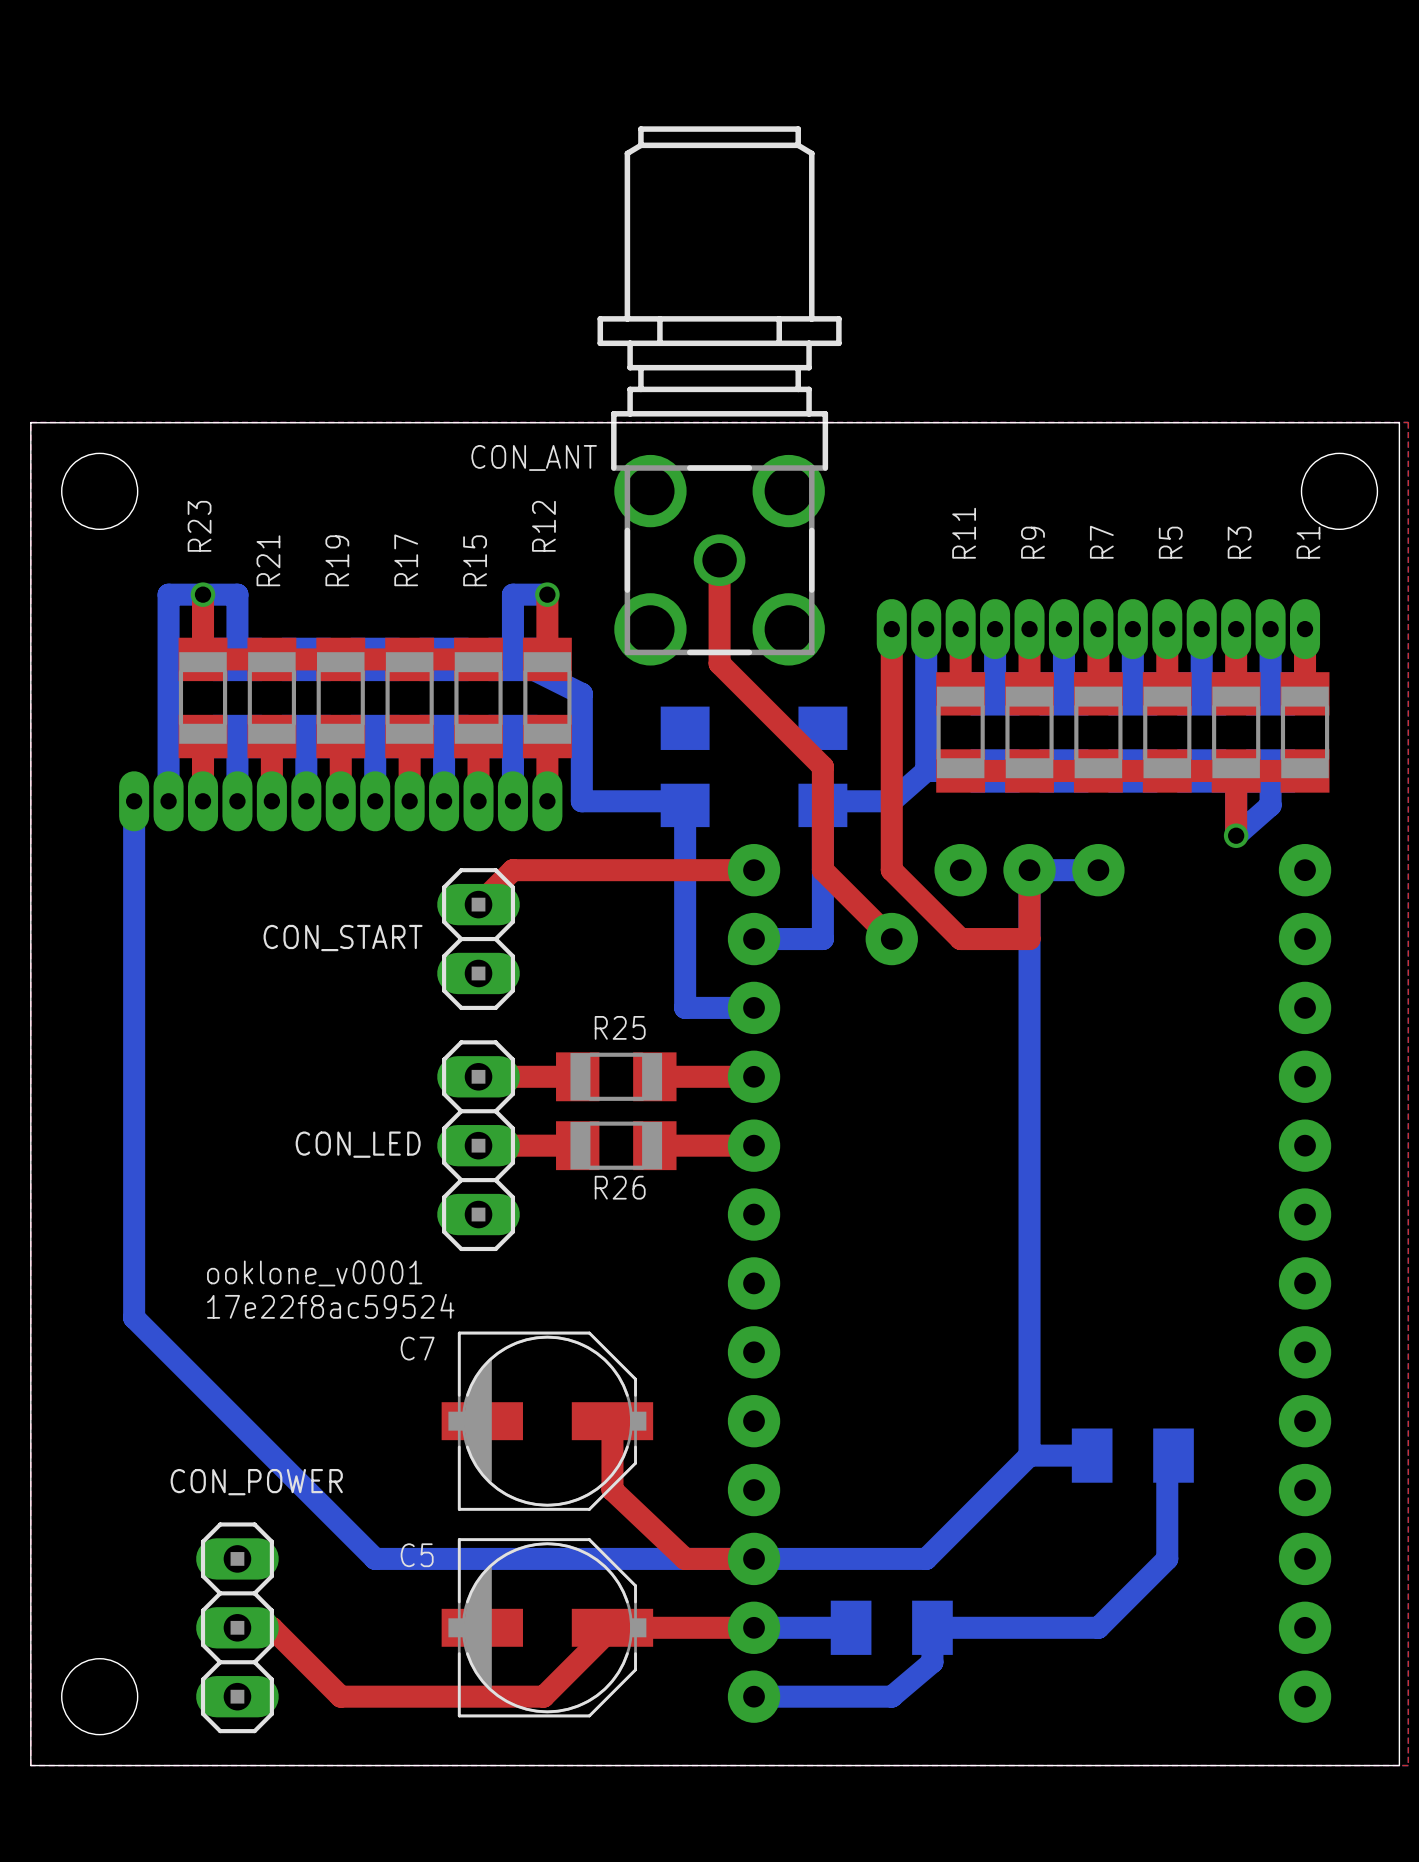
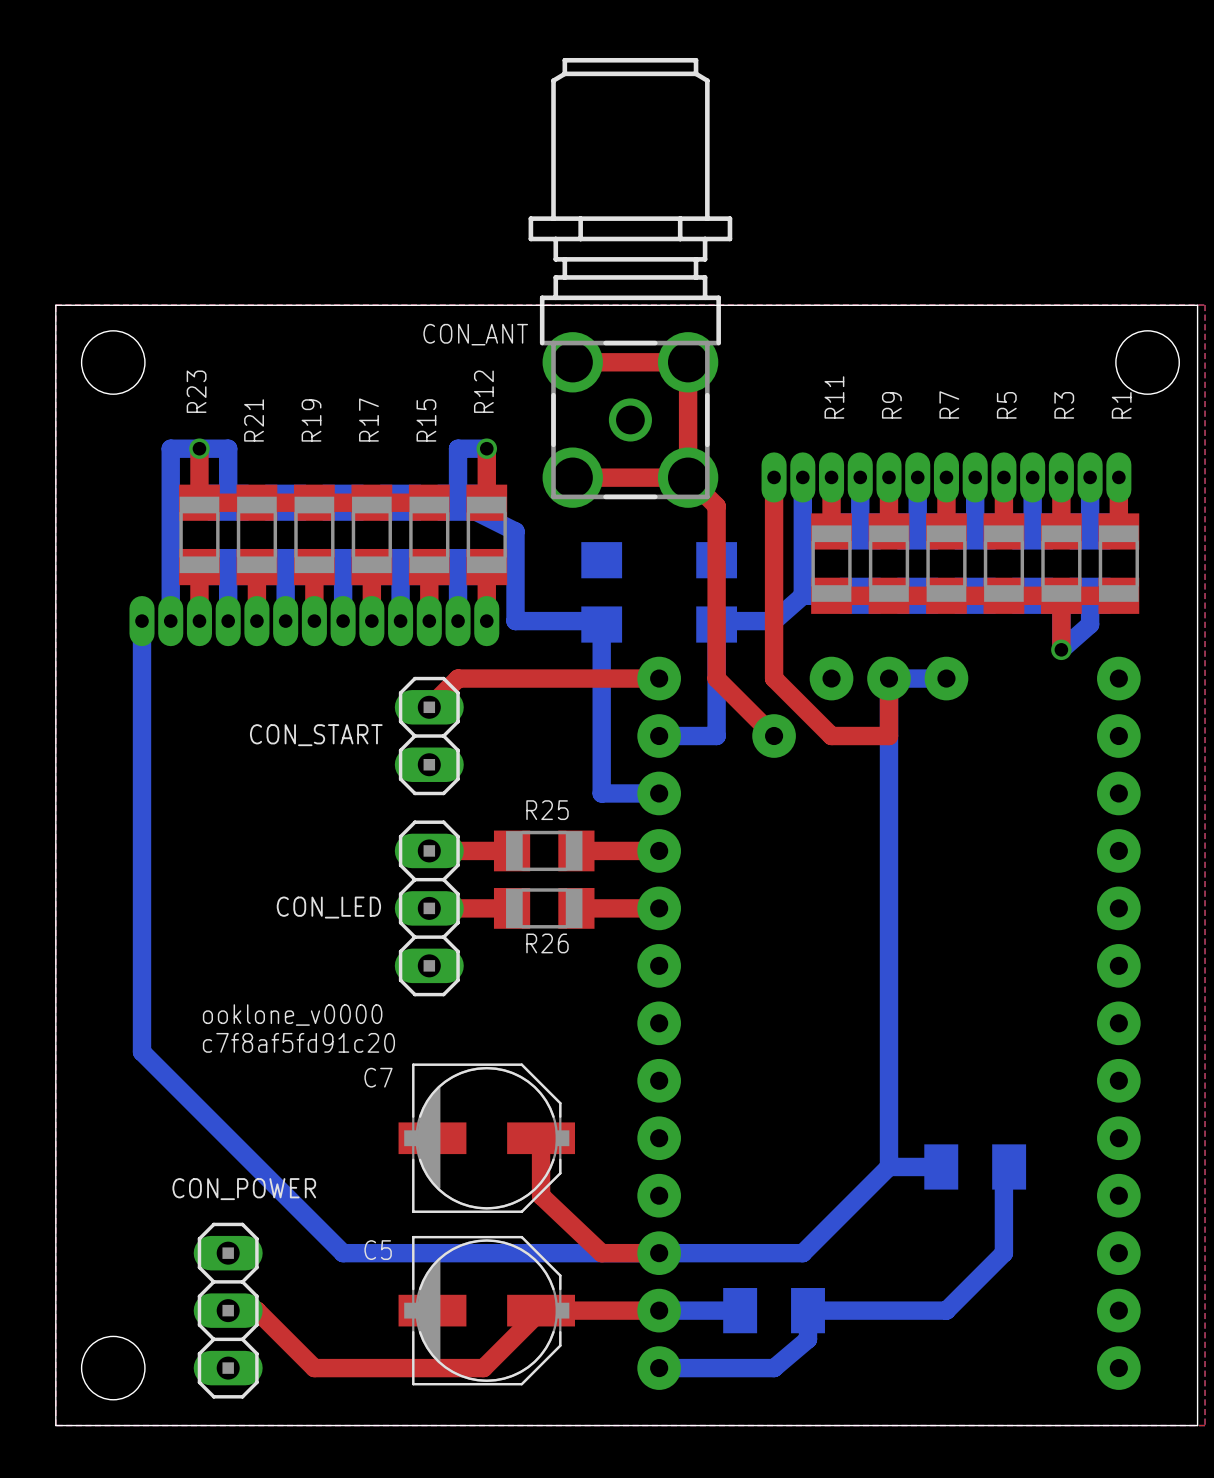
top track: none -> (572, 362) (688, 362) (688, 477) (572, 477)
top track: (719, 560) (719, 663) (822, 766) -> (688, 477) (716, 506) (716, 592)
text: ooklone_v0001 (314, 1273) -> ooklone_v0000 (292, 1015)
text: 17e22f8ac59524 (330, 1306) -> c7f8af5fd91c20 (298, 1042)

